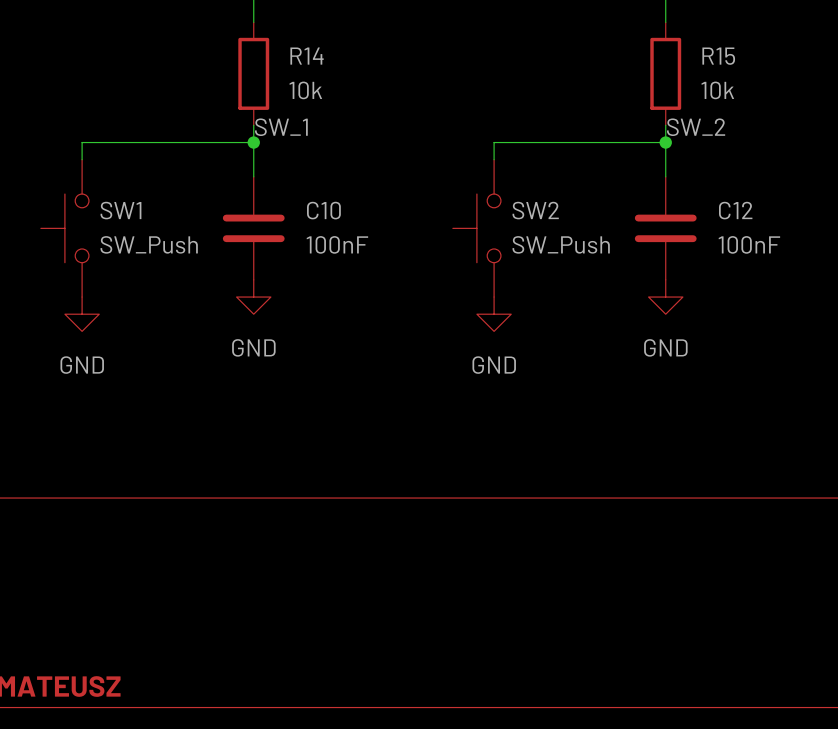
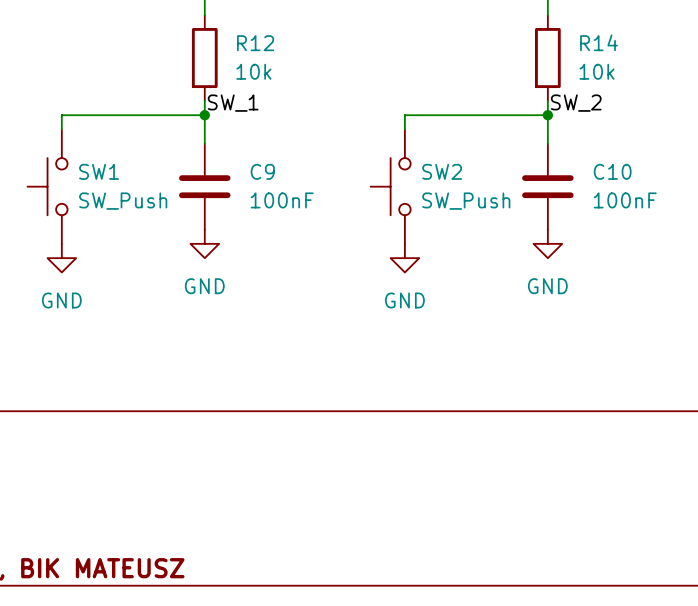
R14 name: R14 (307, 56) -> R12 (255, 43)
R15 name: R15 (718, 56) -> R14 (599, 42)
C10 name: C10 (323, 210) -> C9 (262, 171)
C12 name: C12 (735, 210) -> C10 (612, 171)

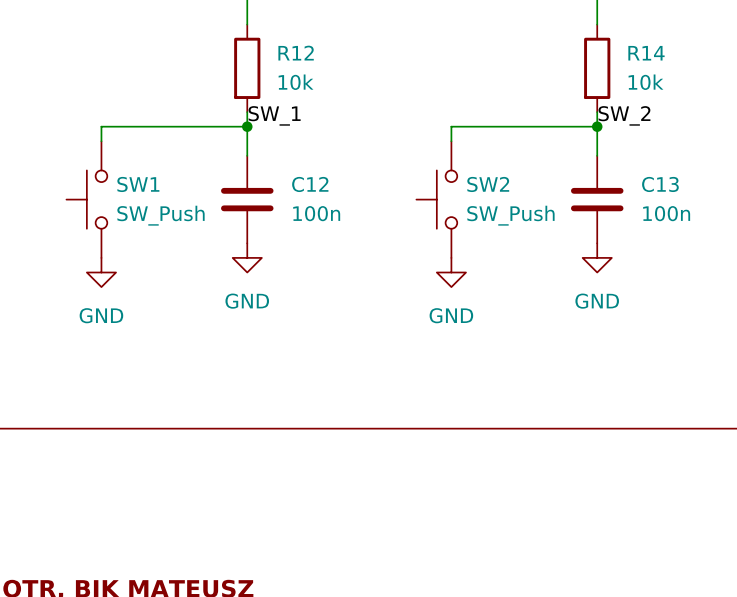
C9 name: C9 (262, 171) -> C12 (310, 184)
C10 name: C10 (612, 171) -> C13 (660, 184)
C9 value: 100nF (282, 200) -> 100n (316, 213)
C10 value: 100nF (625, 200) -> 100n (666, 213)

